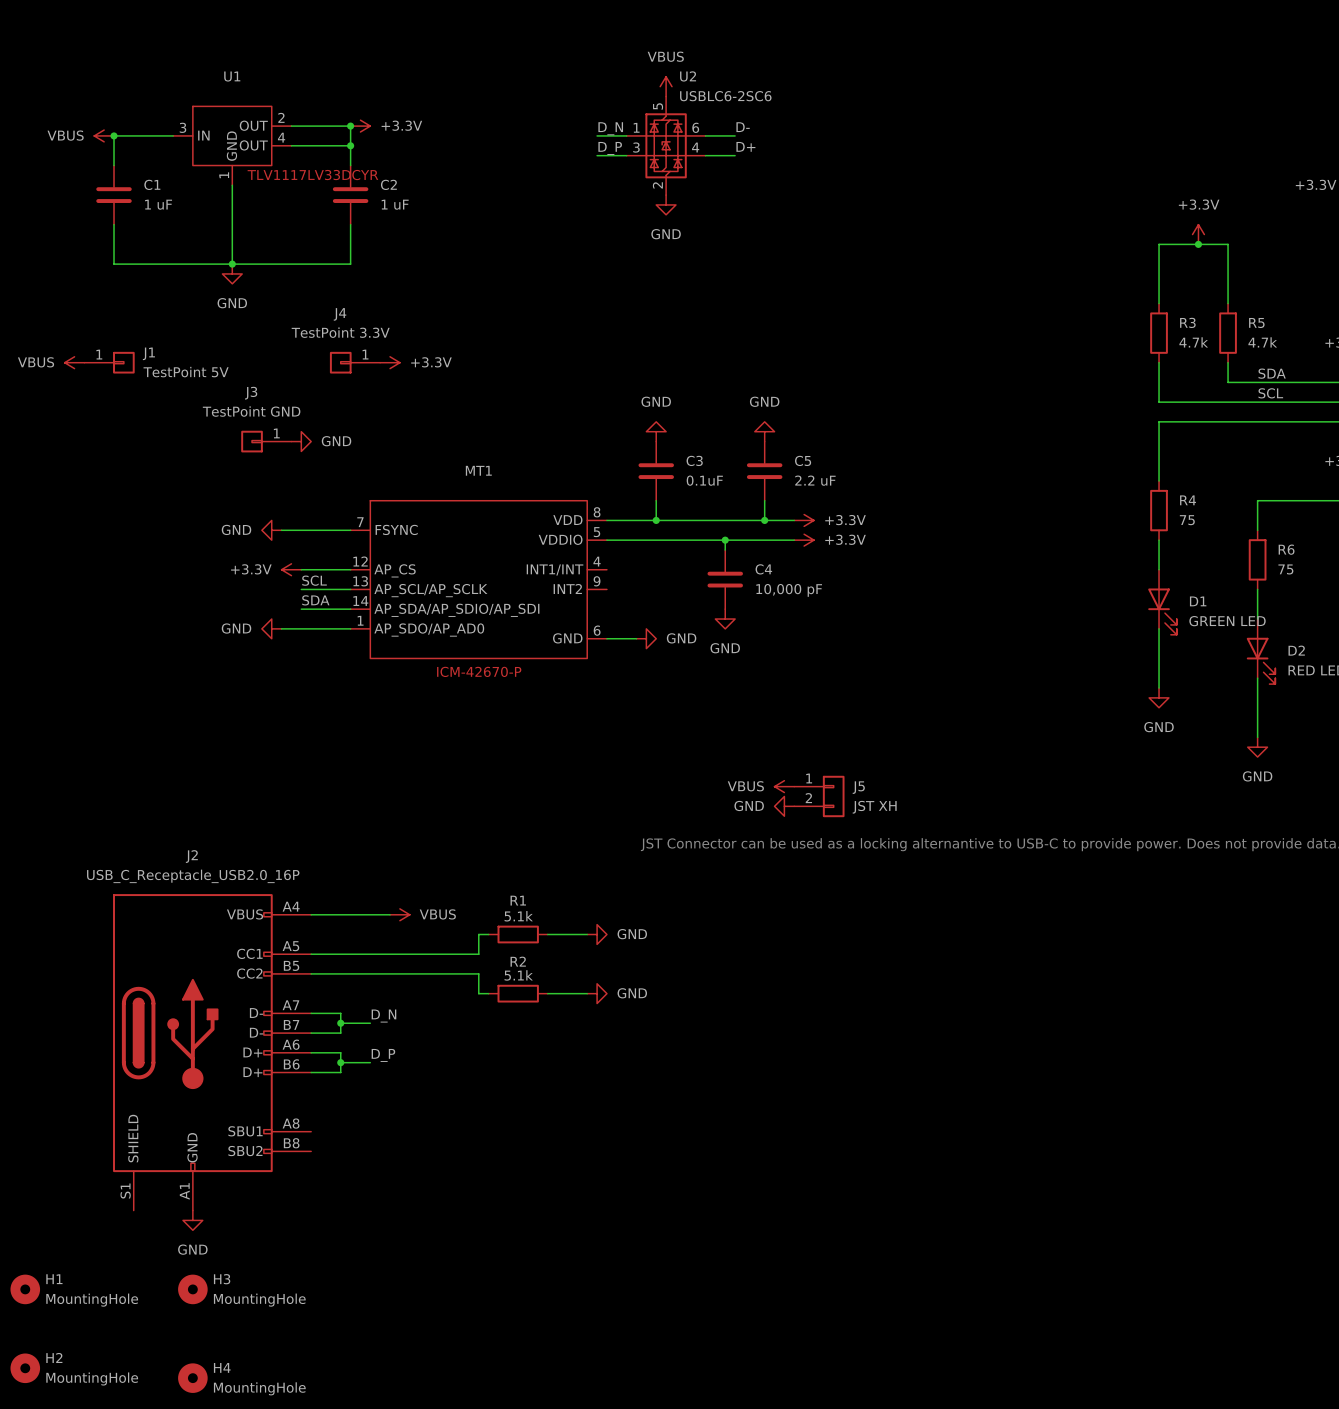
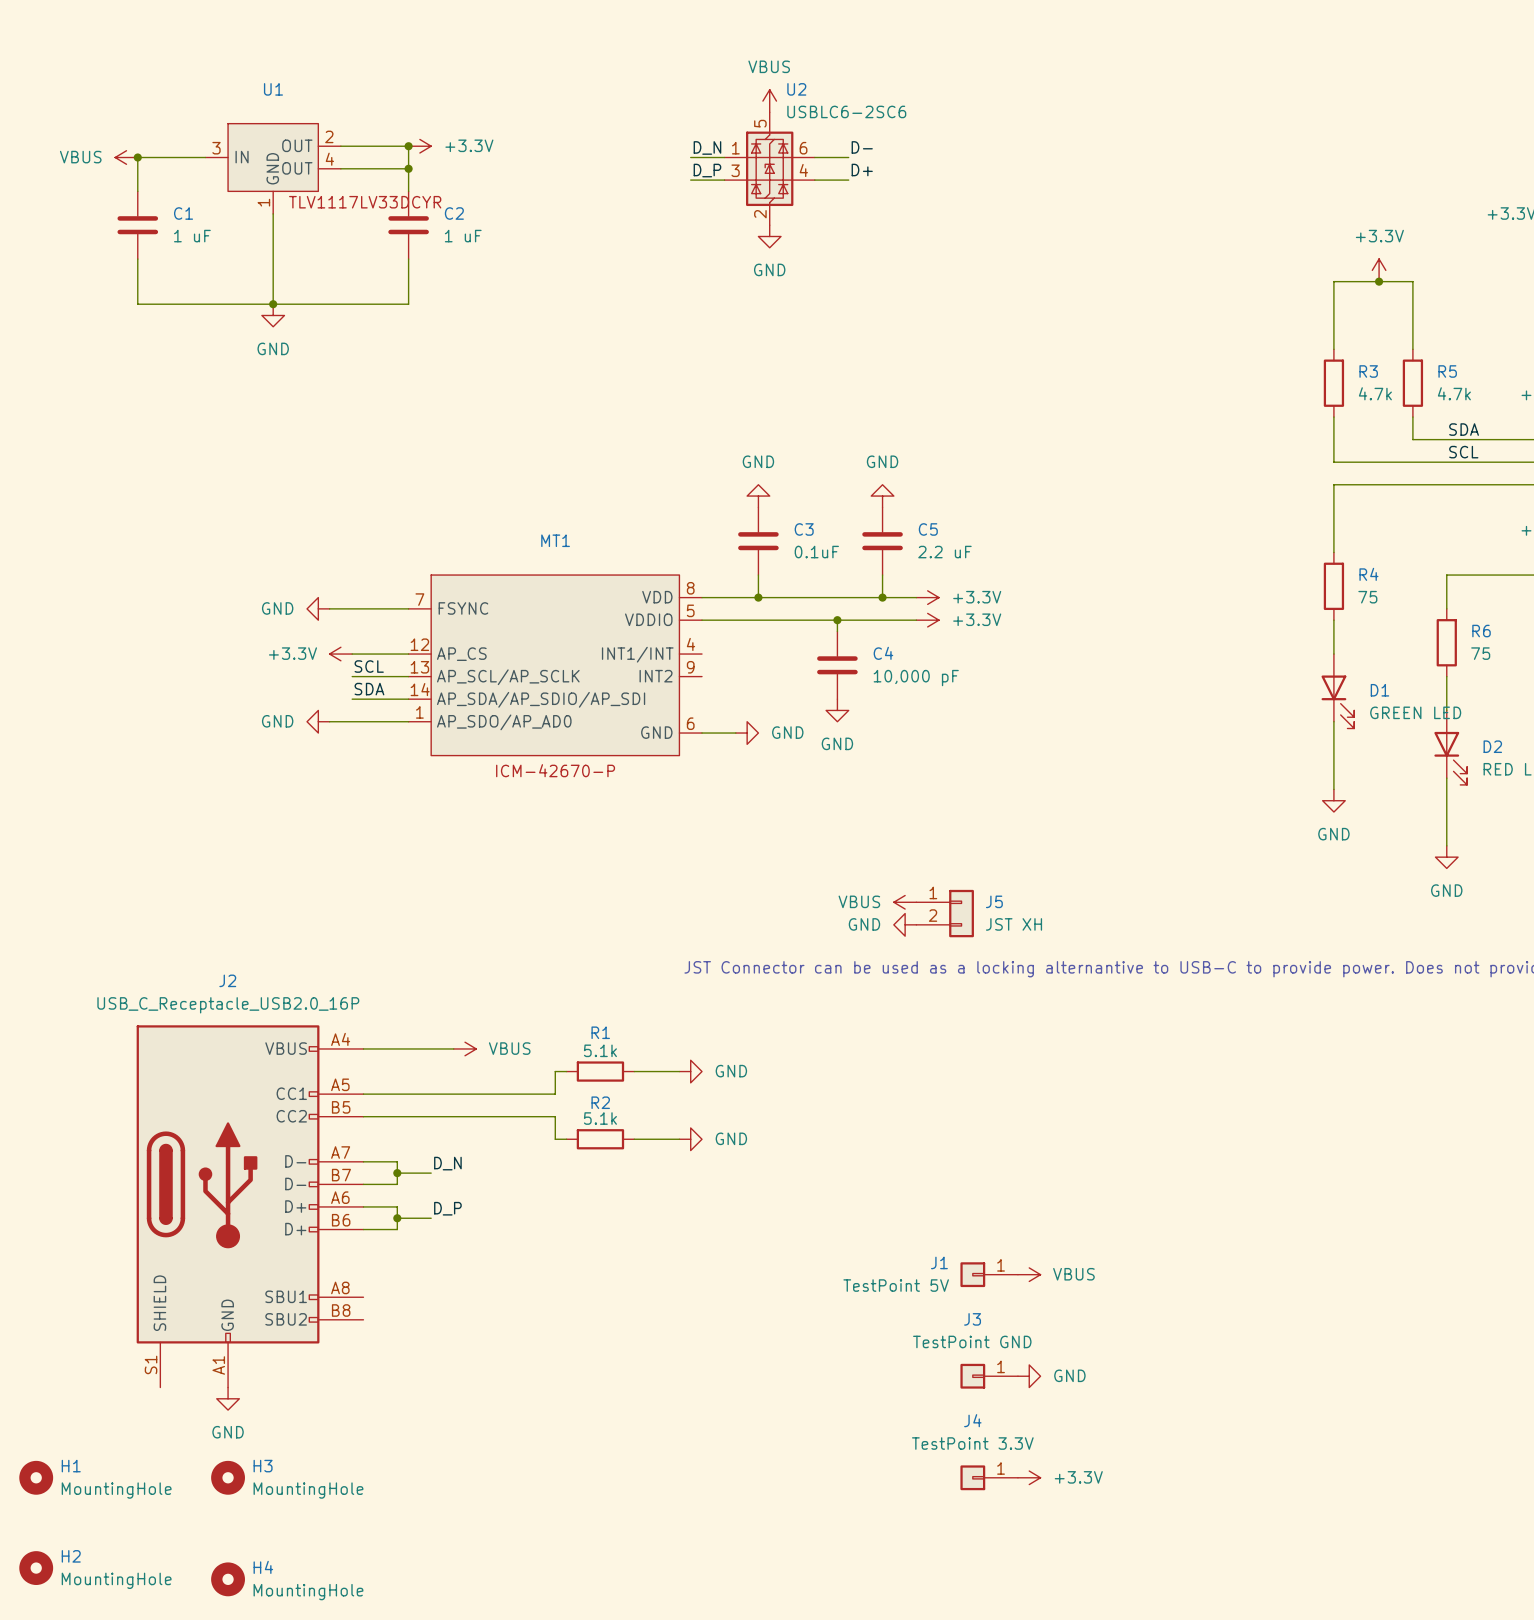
J1 name position: J1 (148, 353) -> J1 (939, 1262)
power symbol: VBUS (74, 362) -> none
J1 position: (109, 362) -> (989, 1274)
J1 rotation: 0° (123, 362) -> 180° (972, 1274)
J4 position: (355, 362) -> (989, 1477)
power symbol: +3.3V (390, 362) -> none
J1 value position: TestPoint 5V (186, 372) -> TestPoint 5V (896, 1285)
J3 position: (266, 441) -> (989, 1376)
power symbol: GND (301, 441) -> none
power symbol: none -> VBUS (1029, 1274)
power symbol: none -> GND (1029, 1376)
power symbol: none -> +3.3V (1029, 1477)

